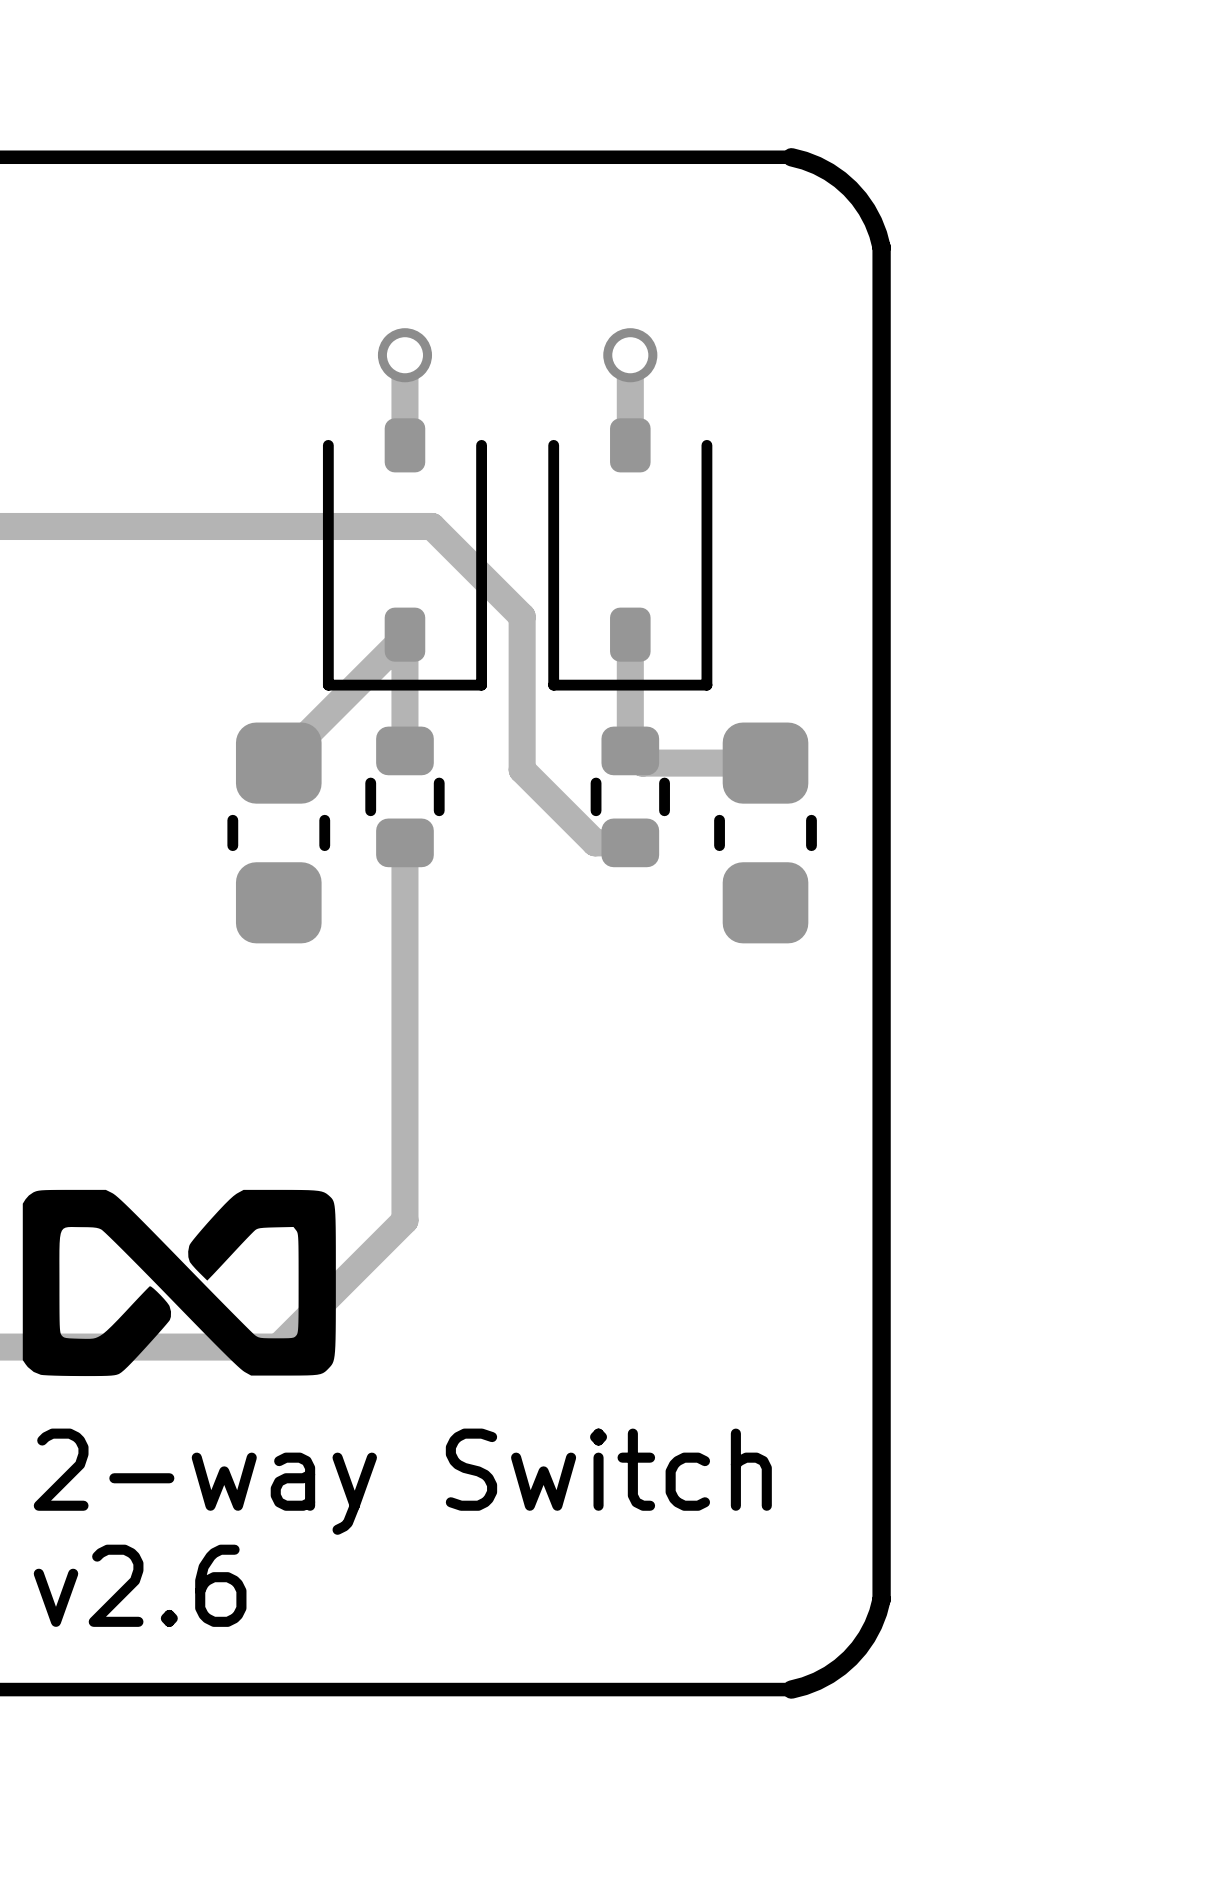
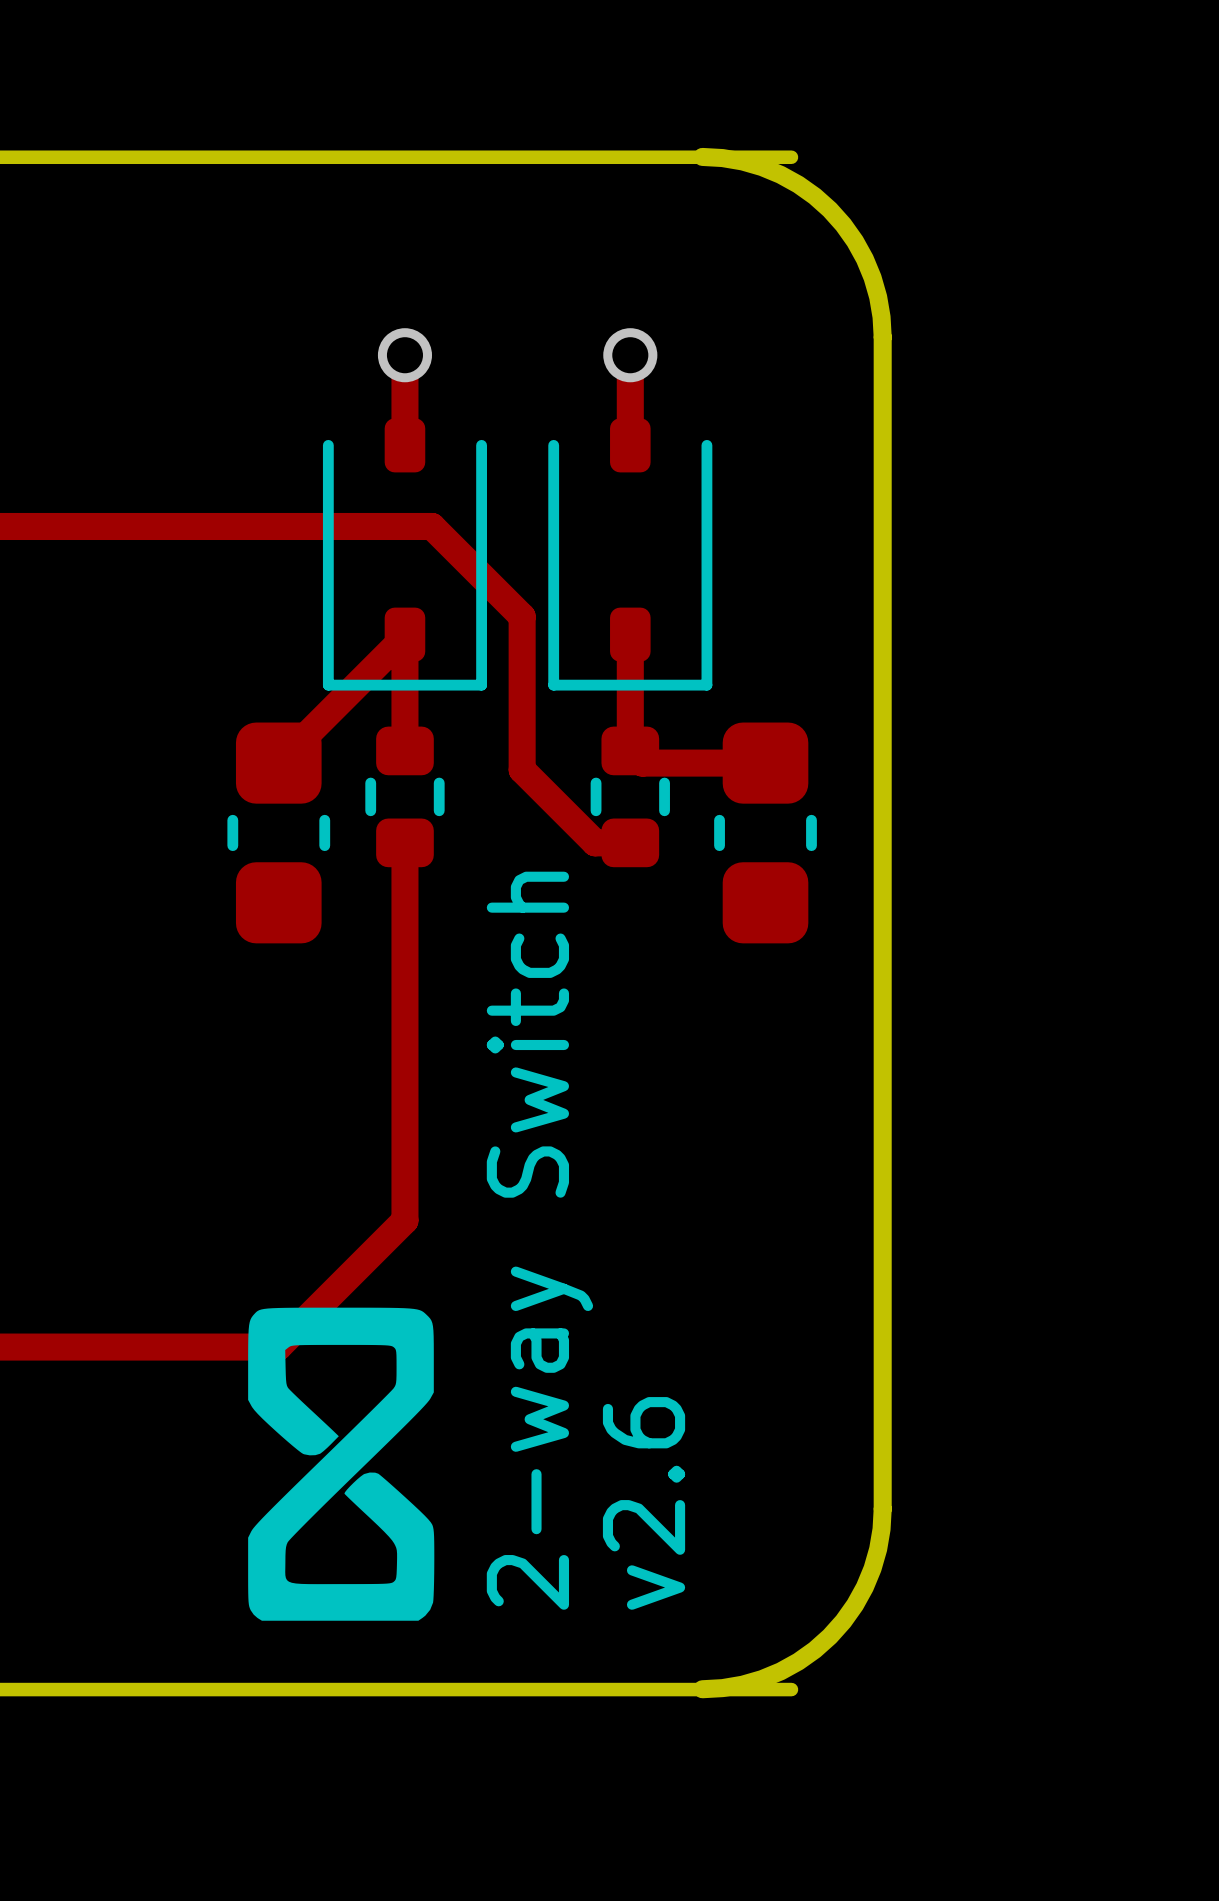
board edge: none -> (702, 156) (742, 161) (761, 167) (798, 184) (829, 209) (855, 241) (872, 277) (881, 317) (882, 337) (881, 1529) (878, 1549) (864, 1587) (843, 1621) (814, 1649) (798, 1661) (761, 1679) (722, 1688) (702, 1689)
board edge: (791, 157) (817, 165) (829, 171) (850, 188) (866, 209) (873, 221) (881, 247) (881, 1599) (873, 1625) (859, 1648) (850, 1658) (840, 1667) (817, 1681) (791, 1689) -> none
drawing: [22, 1189, 336, 1377] -> none
drawing: none -> [248, 1307, 435, 1621]
text rotation: 0° (402, 1481) -> 90° counterclockwise (539, 1240)
text rotation: 0° (140, 1585) -> 90° counterclockwise (644, 1503)
text position: v2.6 (140, 1585) -> v2.6 (644, 1503)

